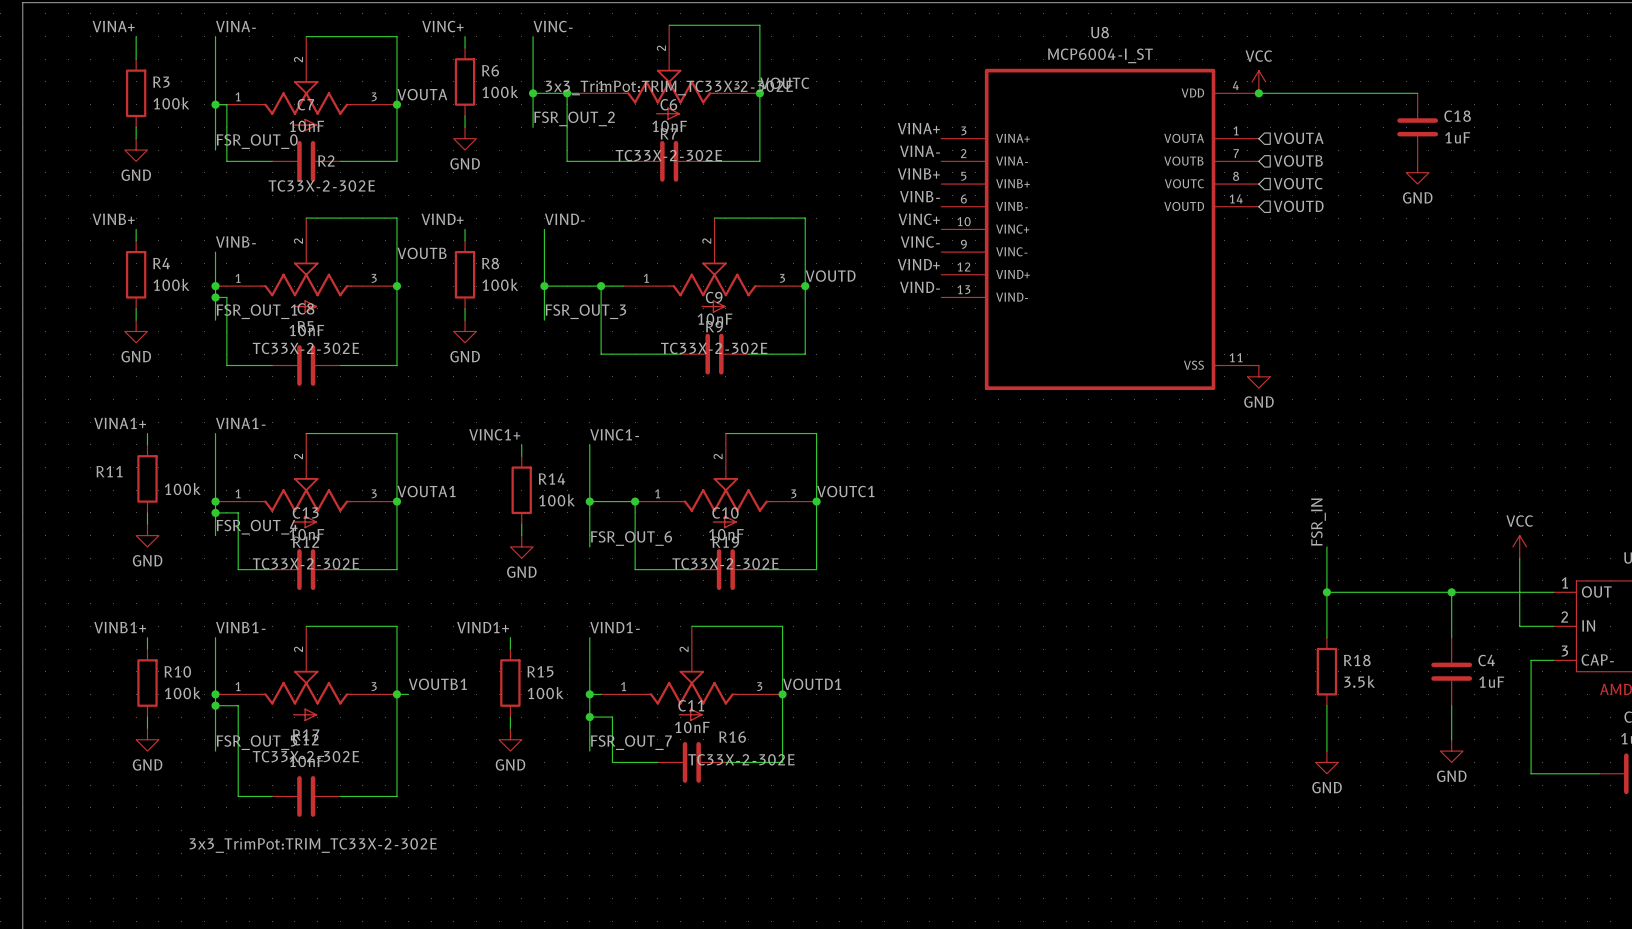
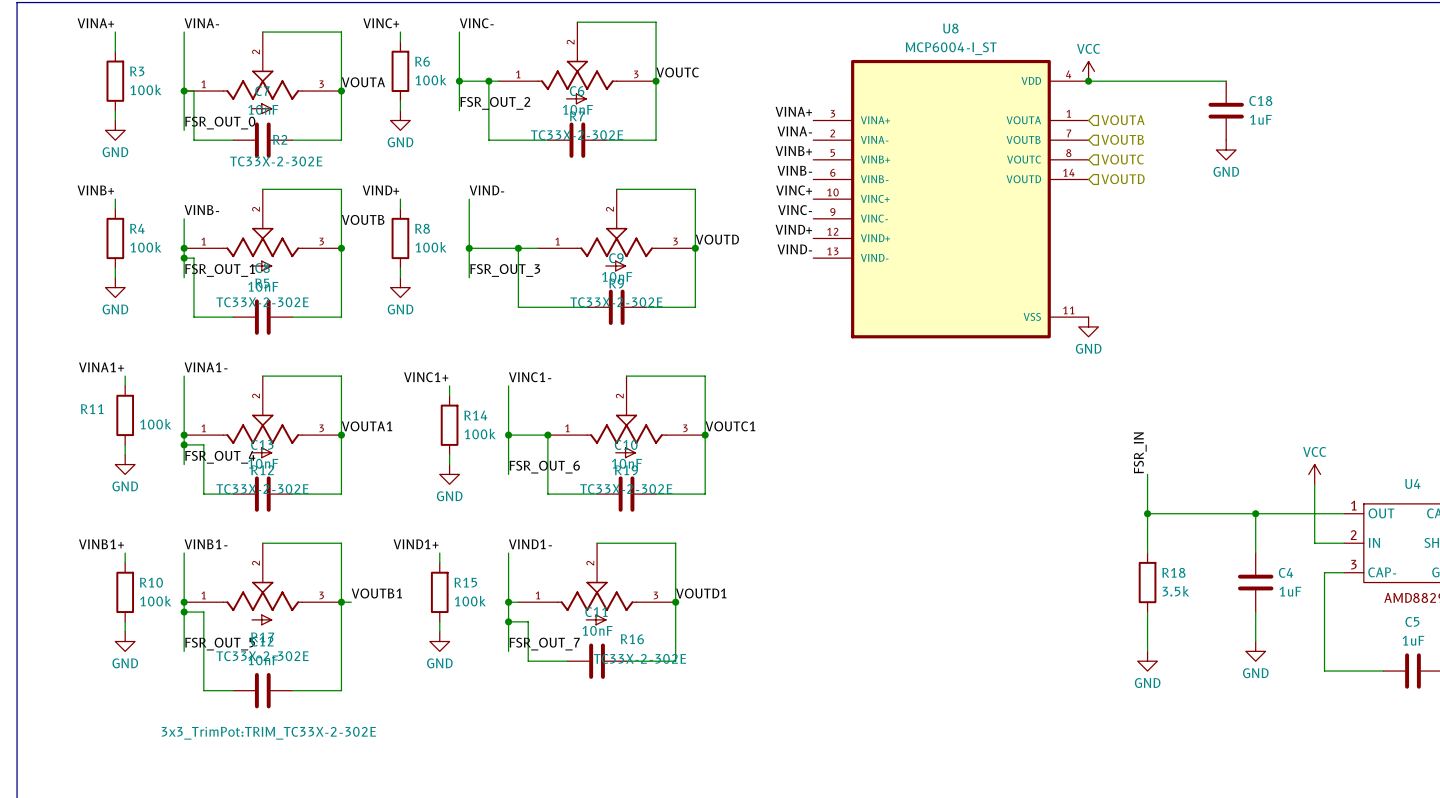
R7 text: 3x3_TrimPot:TRIM_TC33X-2-302E (669, 87) -> none

